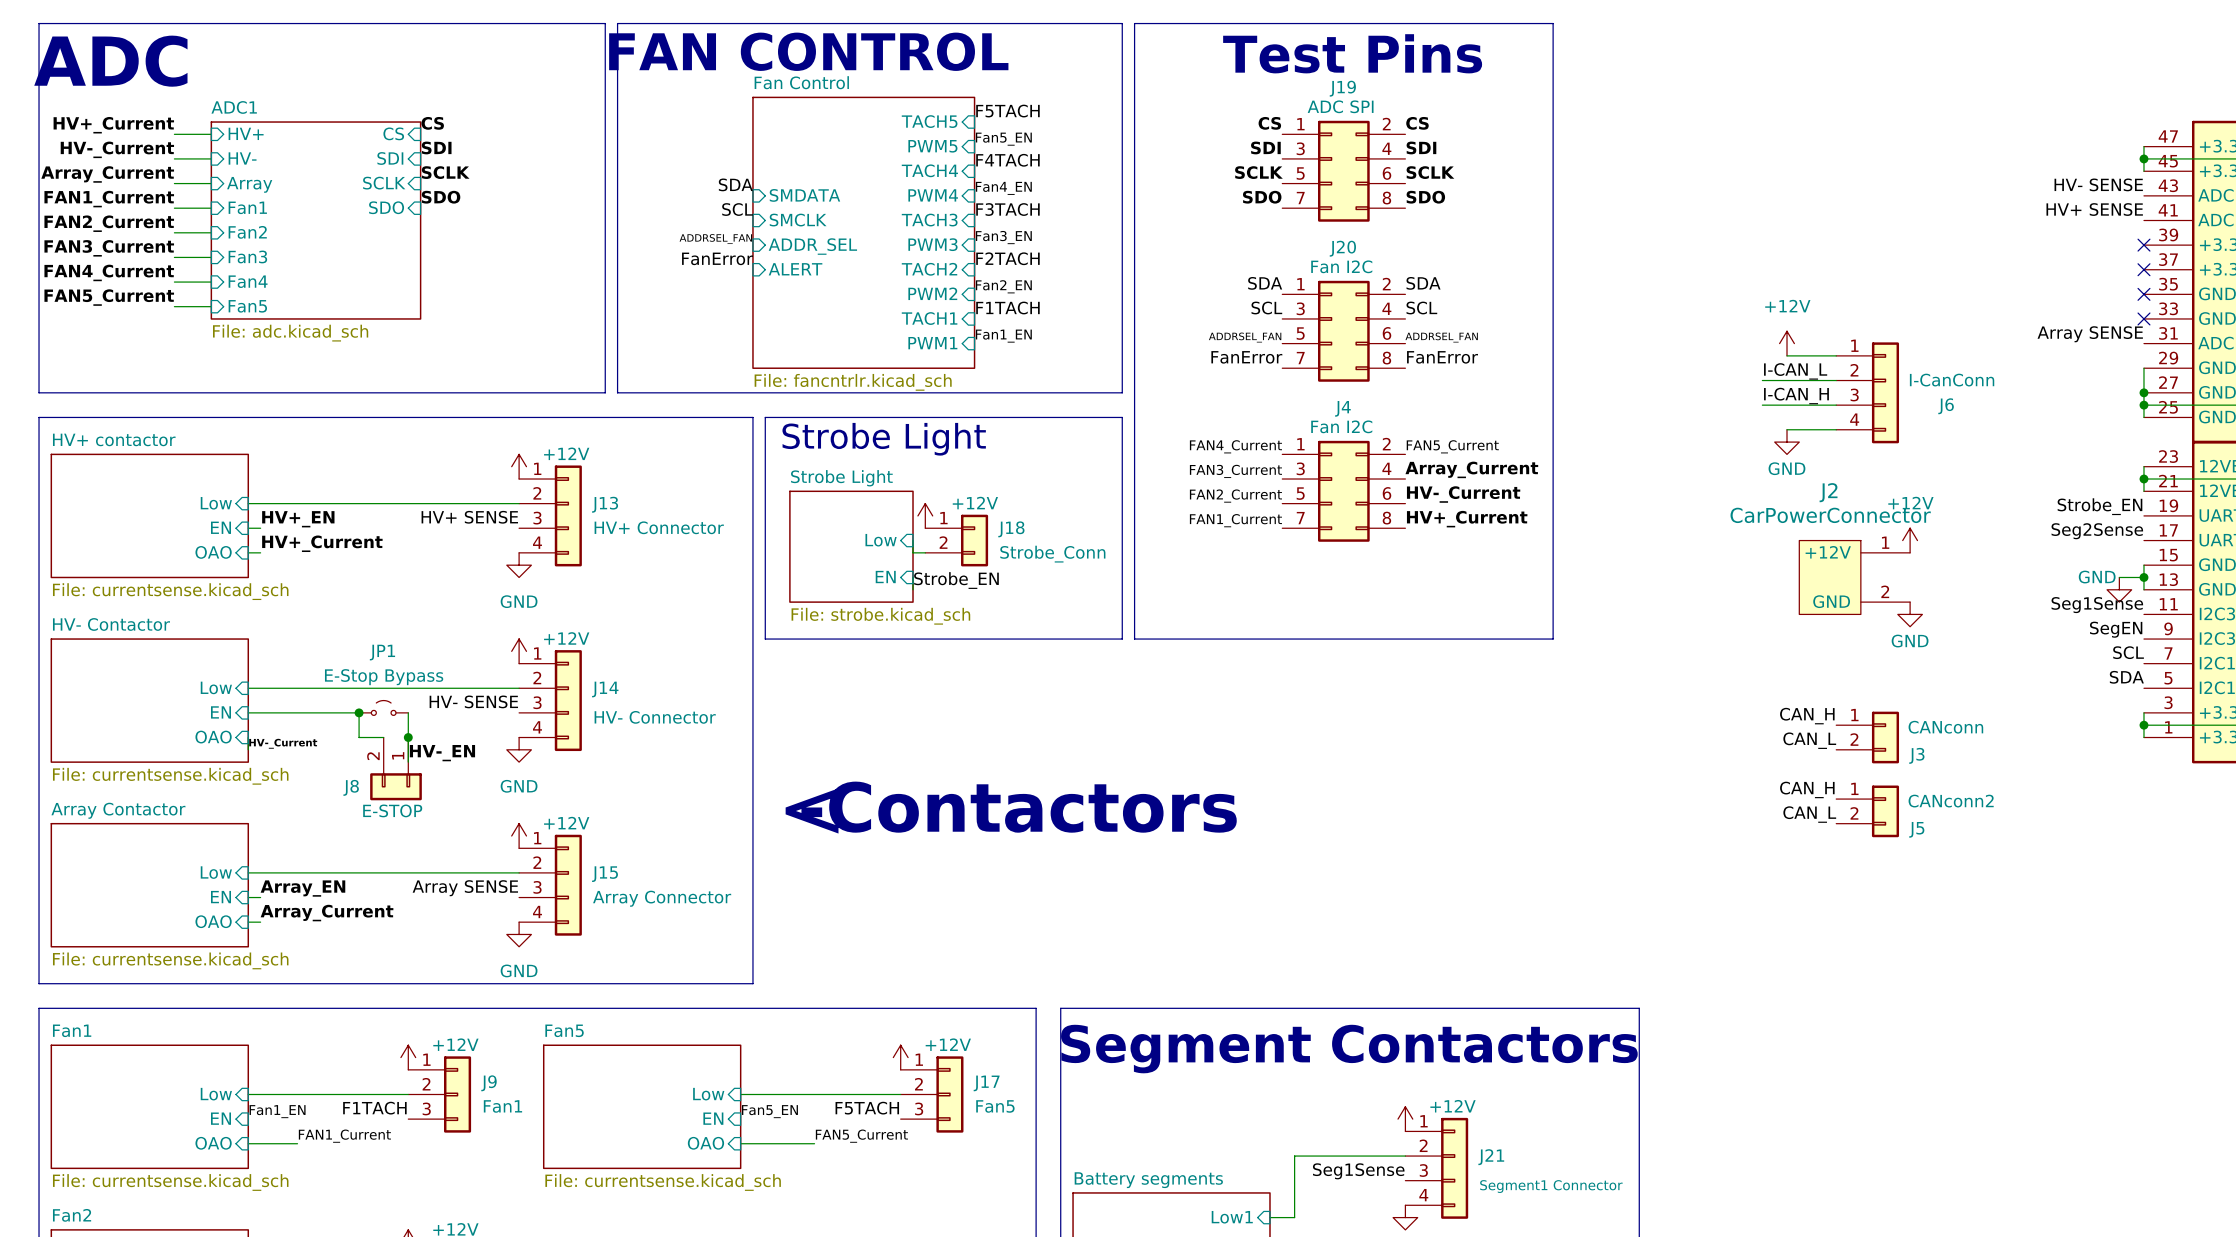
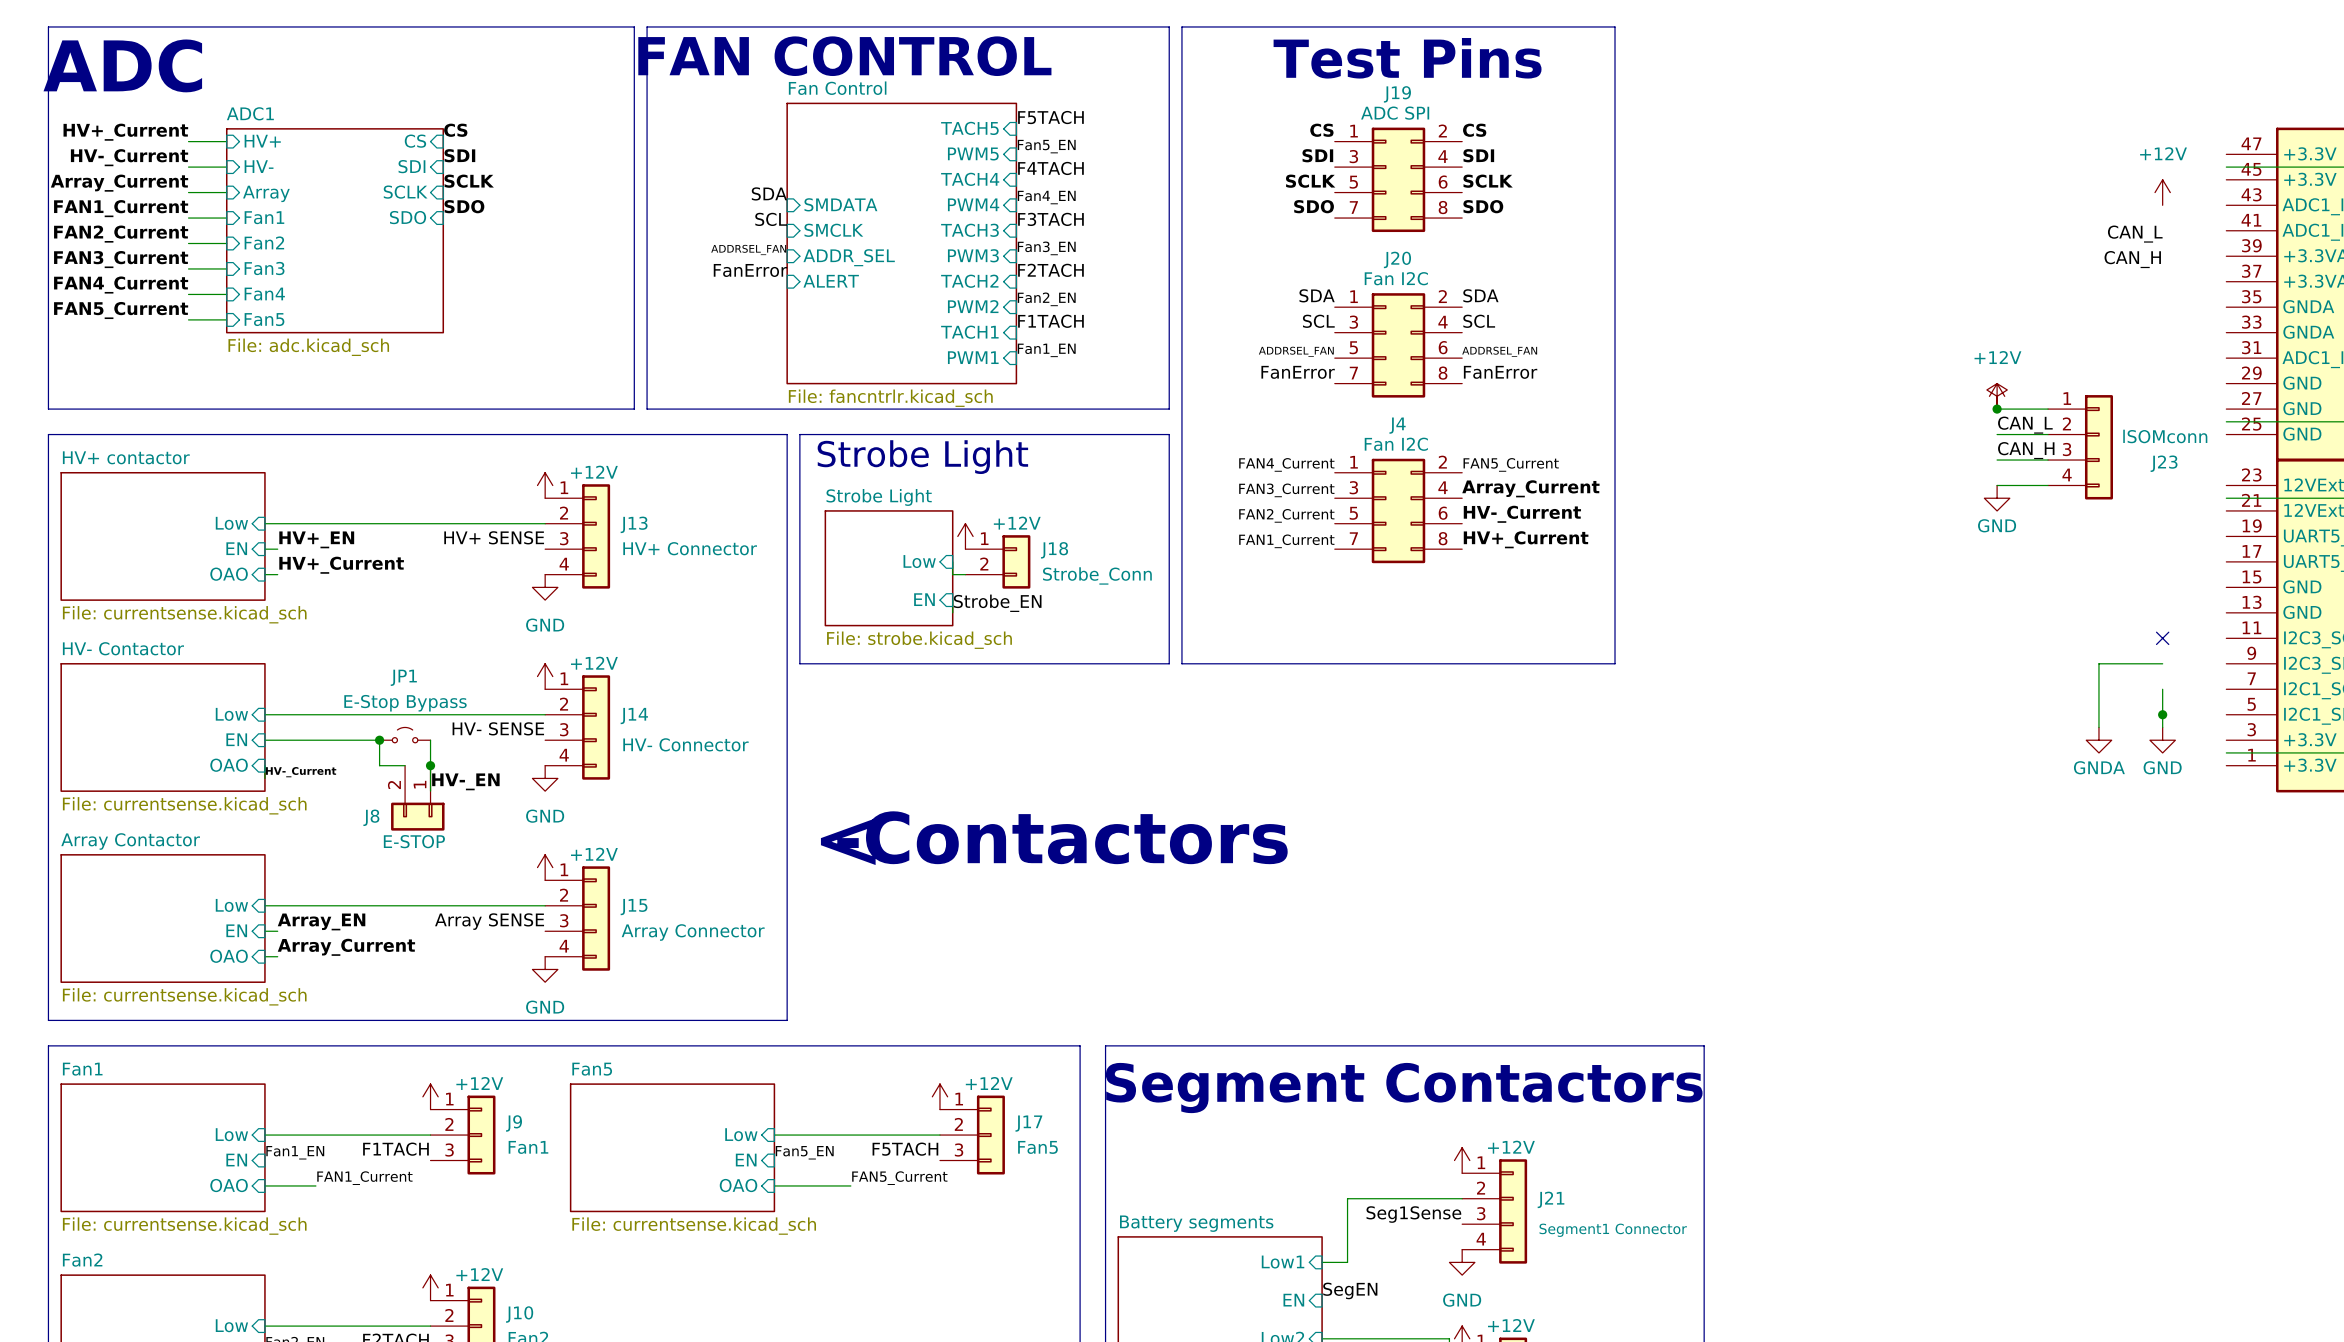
wire: (2143, 146) (2143, 171) -> none
junction: (2143, 158) -> none
power symbol: none -> +12V (2162, 192)
label: HV- SENSE (2098, 184) -> none
label: HV+ SENSE (2094, 209) -> none
label: none -> CAN_L (2135, 234)
no-connect mark: (2143, 245) -> none
label: none -> CAN_H (2132, 259)
no-connect mark: (2143, 269) -> none
no-connect mark: (2143, 294) -> none
no-connect mark: (2143, 318) -> none
label: Array SENSE (2090, 334) -> none
power symbol: +12V (1787, 343) -> none
wire: (1787, 355) (1836, 355) -> (1997, 409) (2048, 409)
wire: (2143, 368) (2143, 417) -> none
label: I-CAN_L (1795, 371) -> none
wire: (1762, 380) (1836, 380) -> none
power symbol: none -> +12V (1997, 396)
power symbol: none -> (1997, 396)
J6: I-CanConn (1867, 392) -> none
junction: none -> (1997, 409)
junction: (2143, 392) -> none
label: I-CAN_H (1796, 396) -> none
wire: (1762, 405) (1836, 405) -> none
junction: (2143, 405) -> none
label: none -> CAN_L (2025, 425)
wire: none -> (1997, 434) (2048, 434)
wire: (1787, 429) (1836, 429) -> (1997, 485) (2048, 485)
J23: none -> lSOMconn (2080, 447)
label: none -> CAN_H (2026, 450)
power symbol: GND (1787, 442) -> none
wire: none -> (1997, 460) (2048, 460)
wire: (2143, 466) (2143, 491) -> none
power symbol: none -> GND (1997, 498)
junction: (2143, 479) -> none
label: Strobe_EN (2099, 506) -> none
label: Seg2Sense (2097, 531) -> none
power symbol: +12V (1910, 540) -> none
wire: (2143, 565) (2143, 589) -> none
J2: CarPowerConnector (1854, 577) -> none
wire: (2119, 577) (2143, 577) -> none
junction: (2143, 577) -> none
power symbol: GND (2119, 589) -> none
label: Seg1Sense (2097, 605) -> none
power symbol: GND (1910, 614) -> none
no-connect mark: none -> (2162, 638)
label: SegEN (2116, 629) -> none
wire: none -> (2162, 663) (2098, 663) (2098, 727)
label: SCL (2128, 652) -> none
wire: none -> (2162, 689) (2162, 727)
label: SDA (2126, 677) -> none
junction: none -> (2162, 714)
power symbol: none -> GNDA (2098, 740)
power symbol: none -> GND (2162, 740)
wire: (2143, 712) (2143, 737) -> none
label: CAN_H (1807, 716) -> none
junction: (2143, 725) -> none
J3: CANconn (1867, 737) -> none
label: CAN_L (1809, 740) -> none
label: CAN_H (1807, 789) -> none
J5: CANconn2 (1867, 811) -> none
label: CAN_L (1809, 814) -> none

